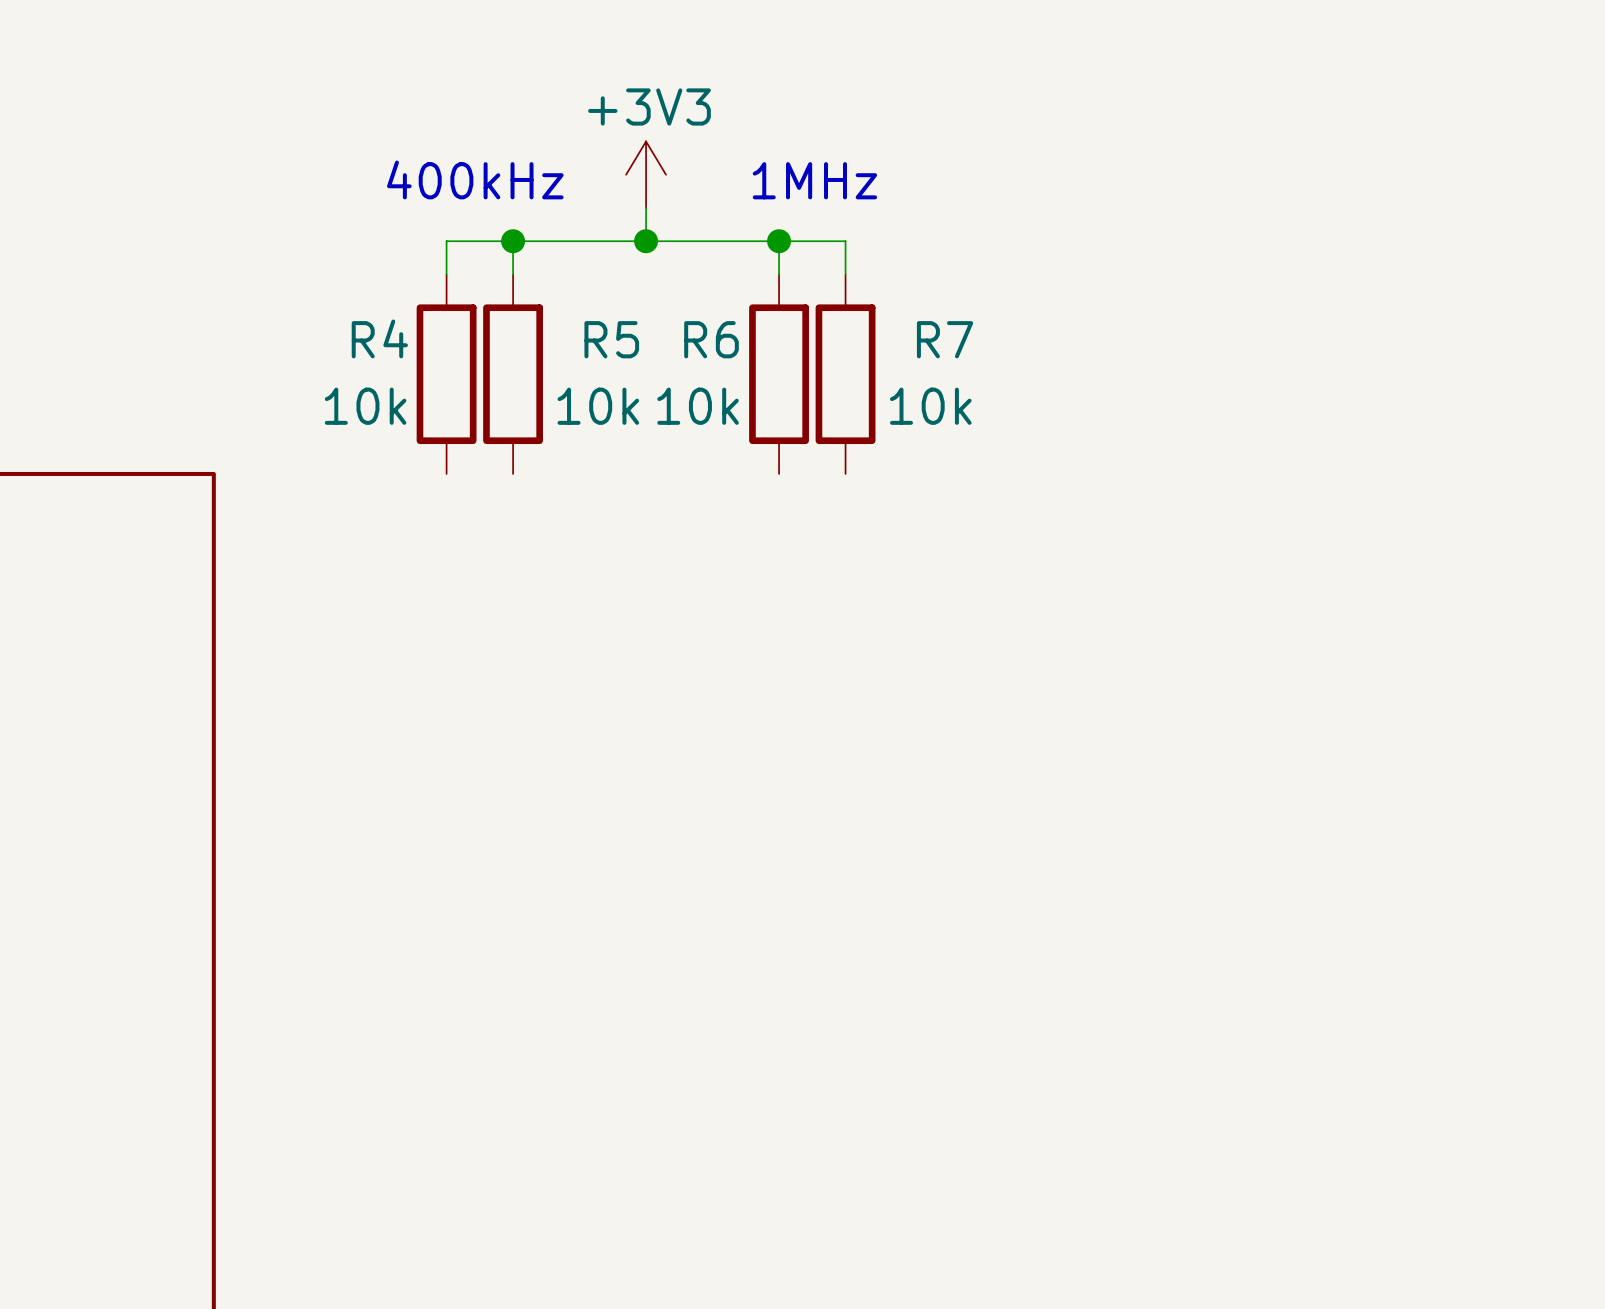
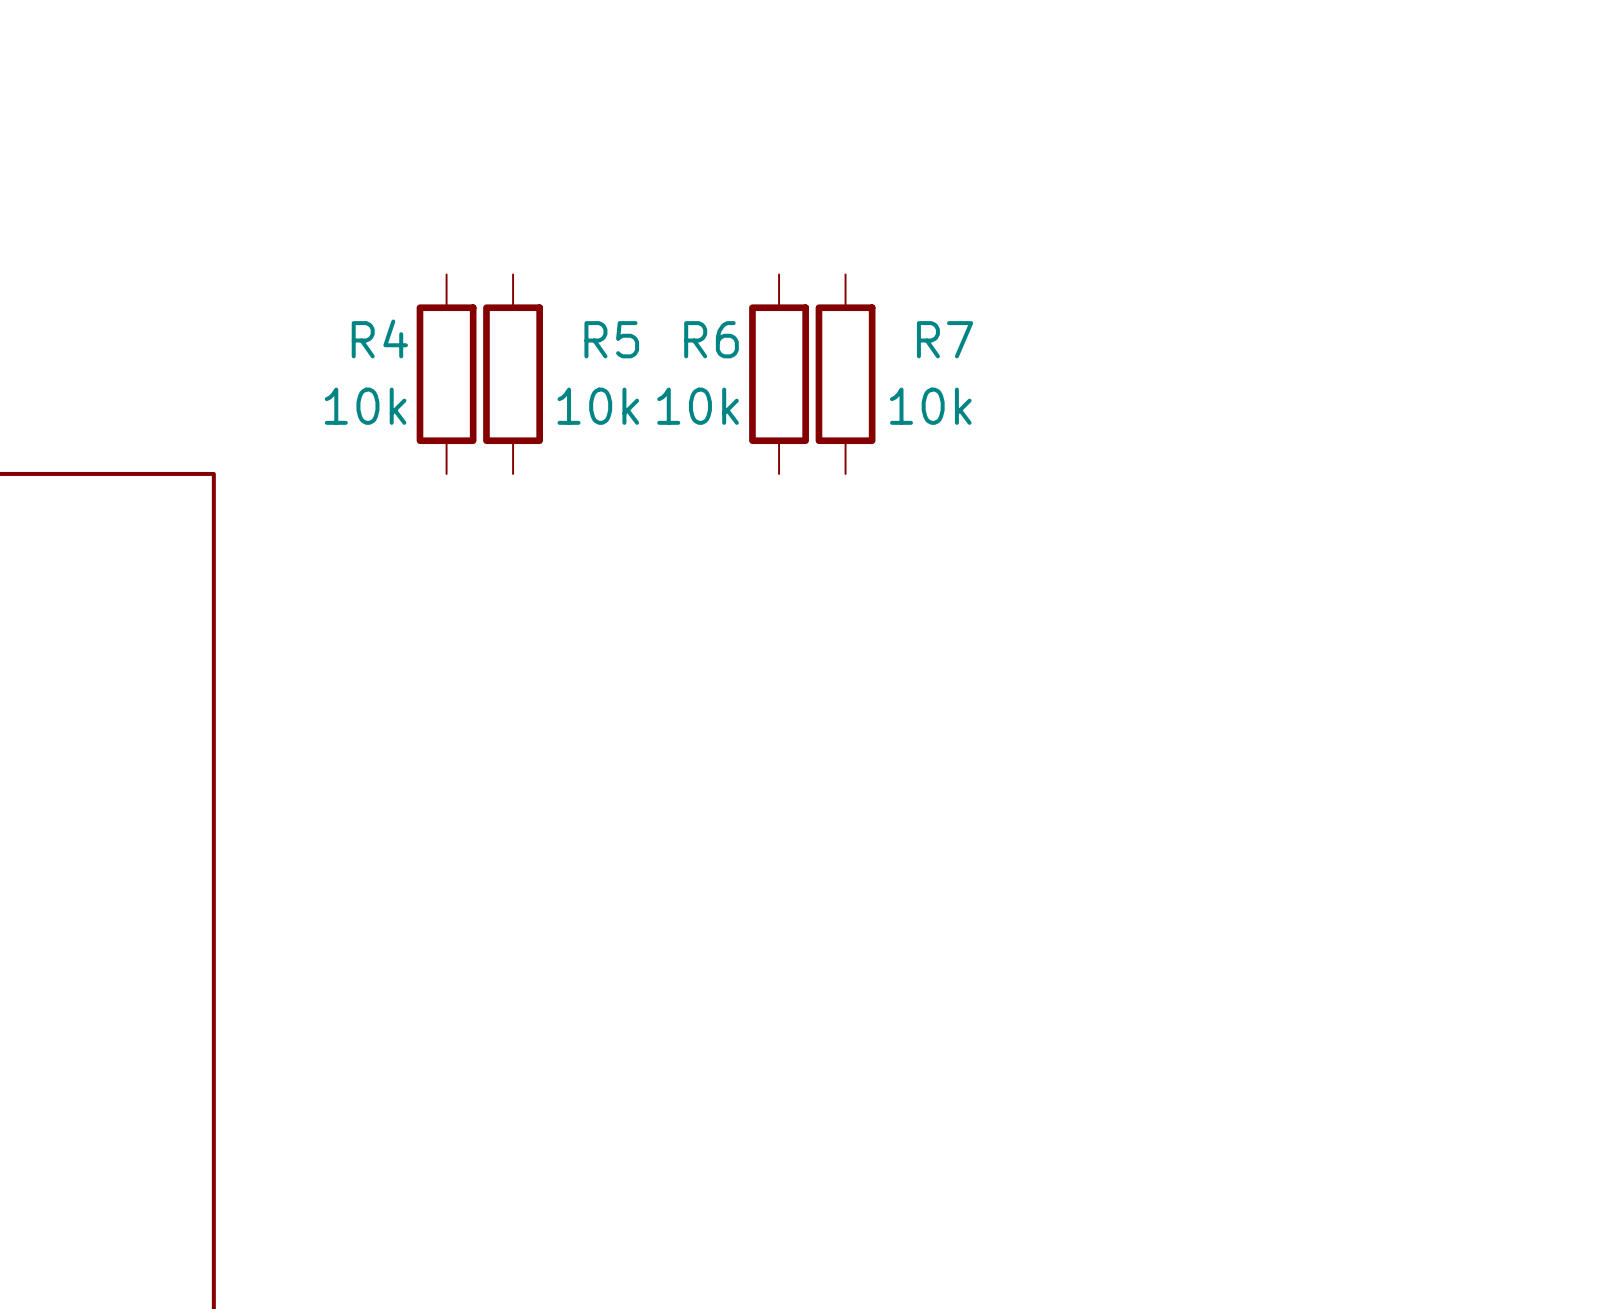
power symbol: +3V3 (646, 174) -> none
text: 400kHz (475, 179) -> none
text: 1MHz (814, 180) -> none
wire: (646, 207) (646, 241) -> none
wire: (513, 241) (513, 274) -> none
junction: (513, 241) -> none
junction: (646, 241) -> none
wire: (779, 241) (779, 274) -> none
junction: (779, 241) -> none
wire: (446, 274) (446, 241) (845, 241) (845, 274) -> none

